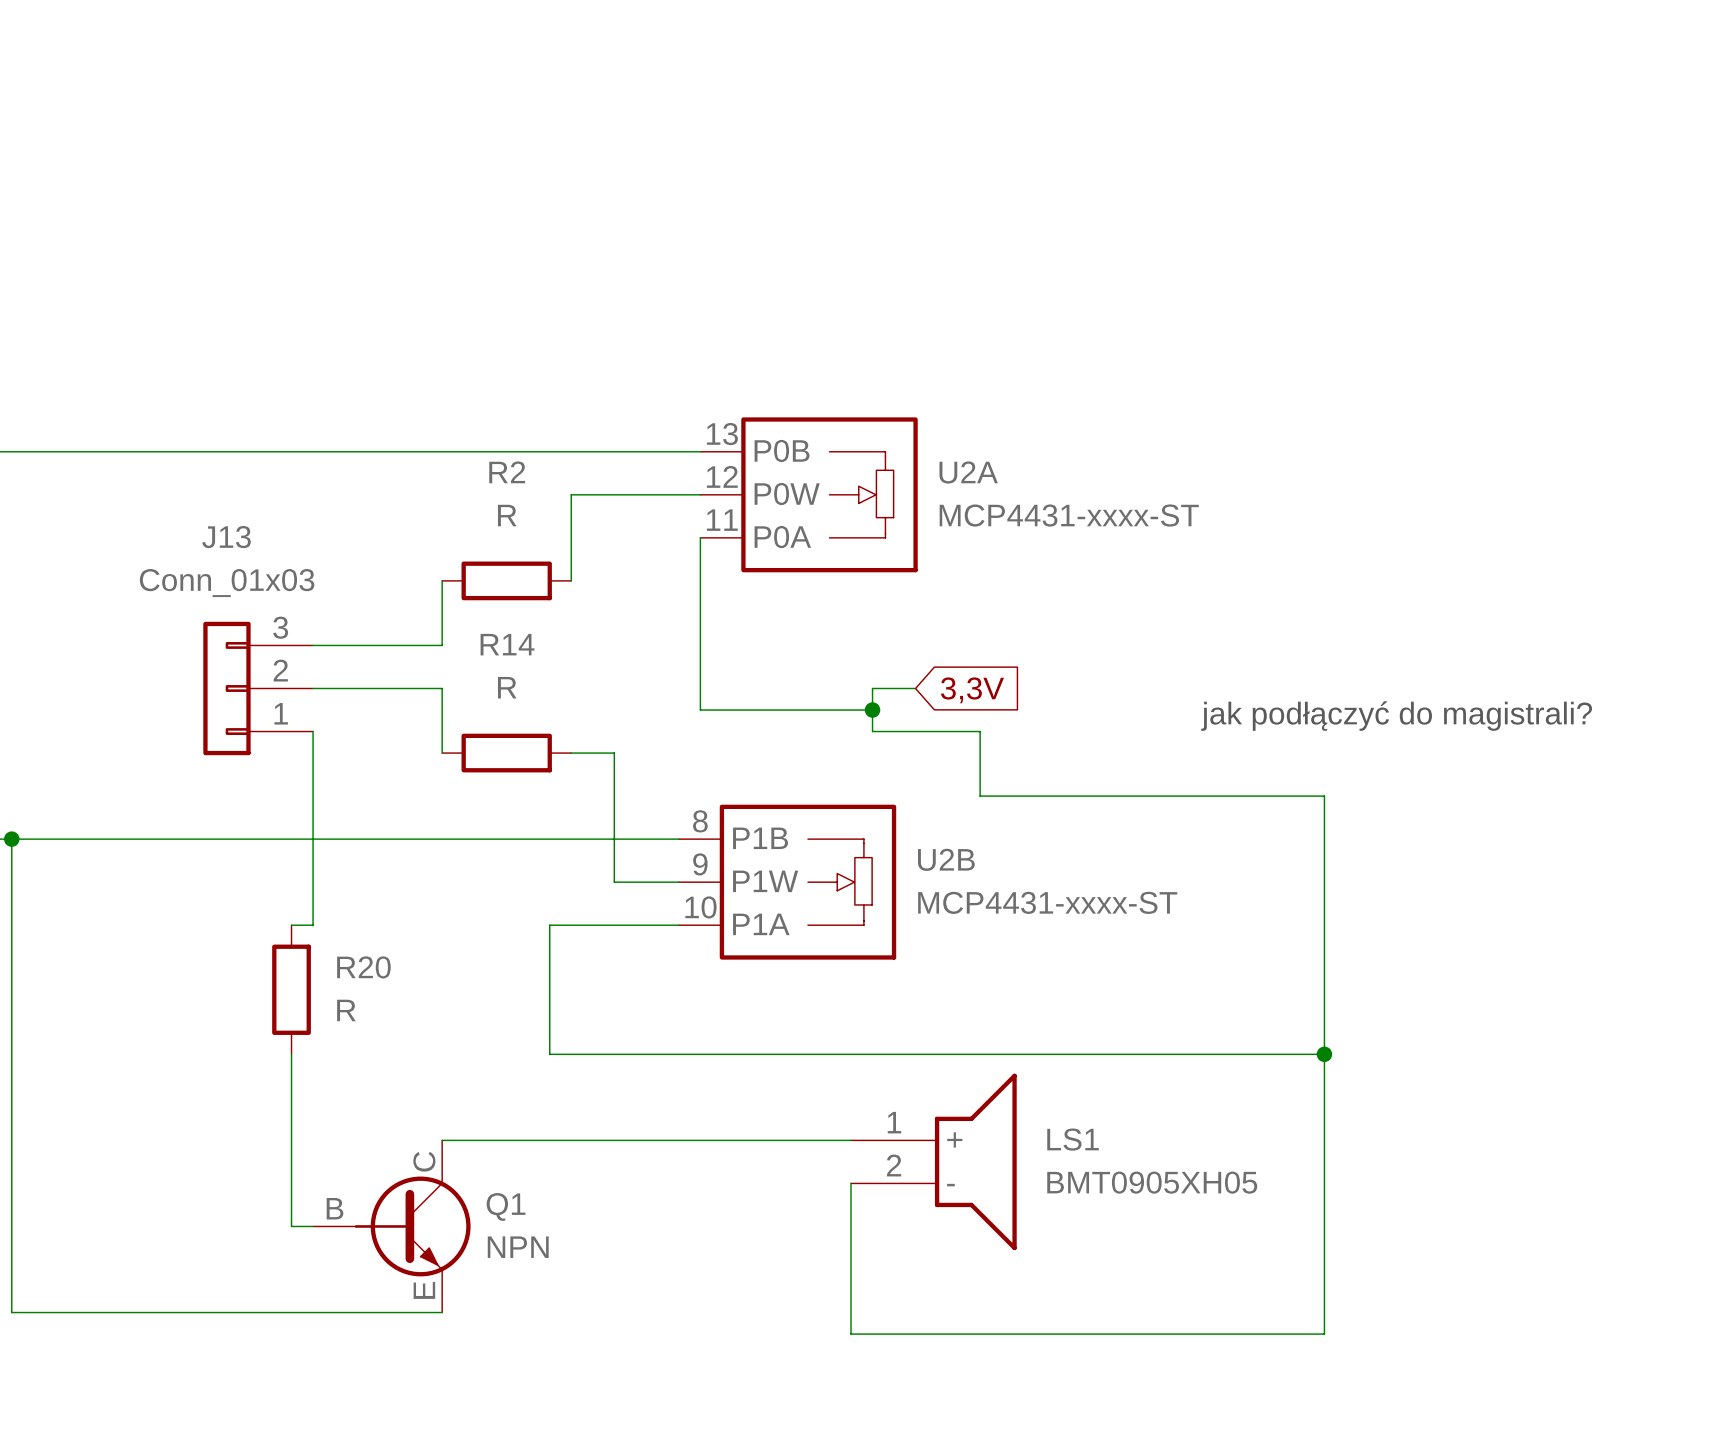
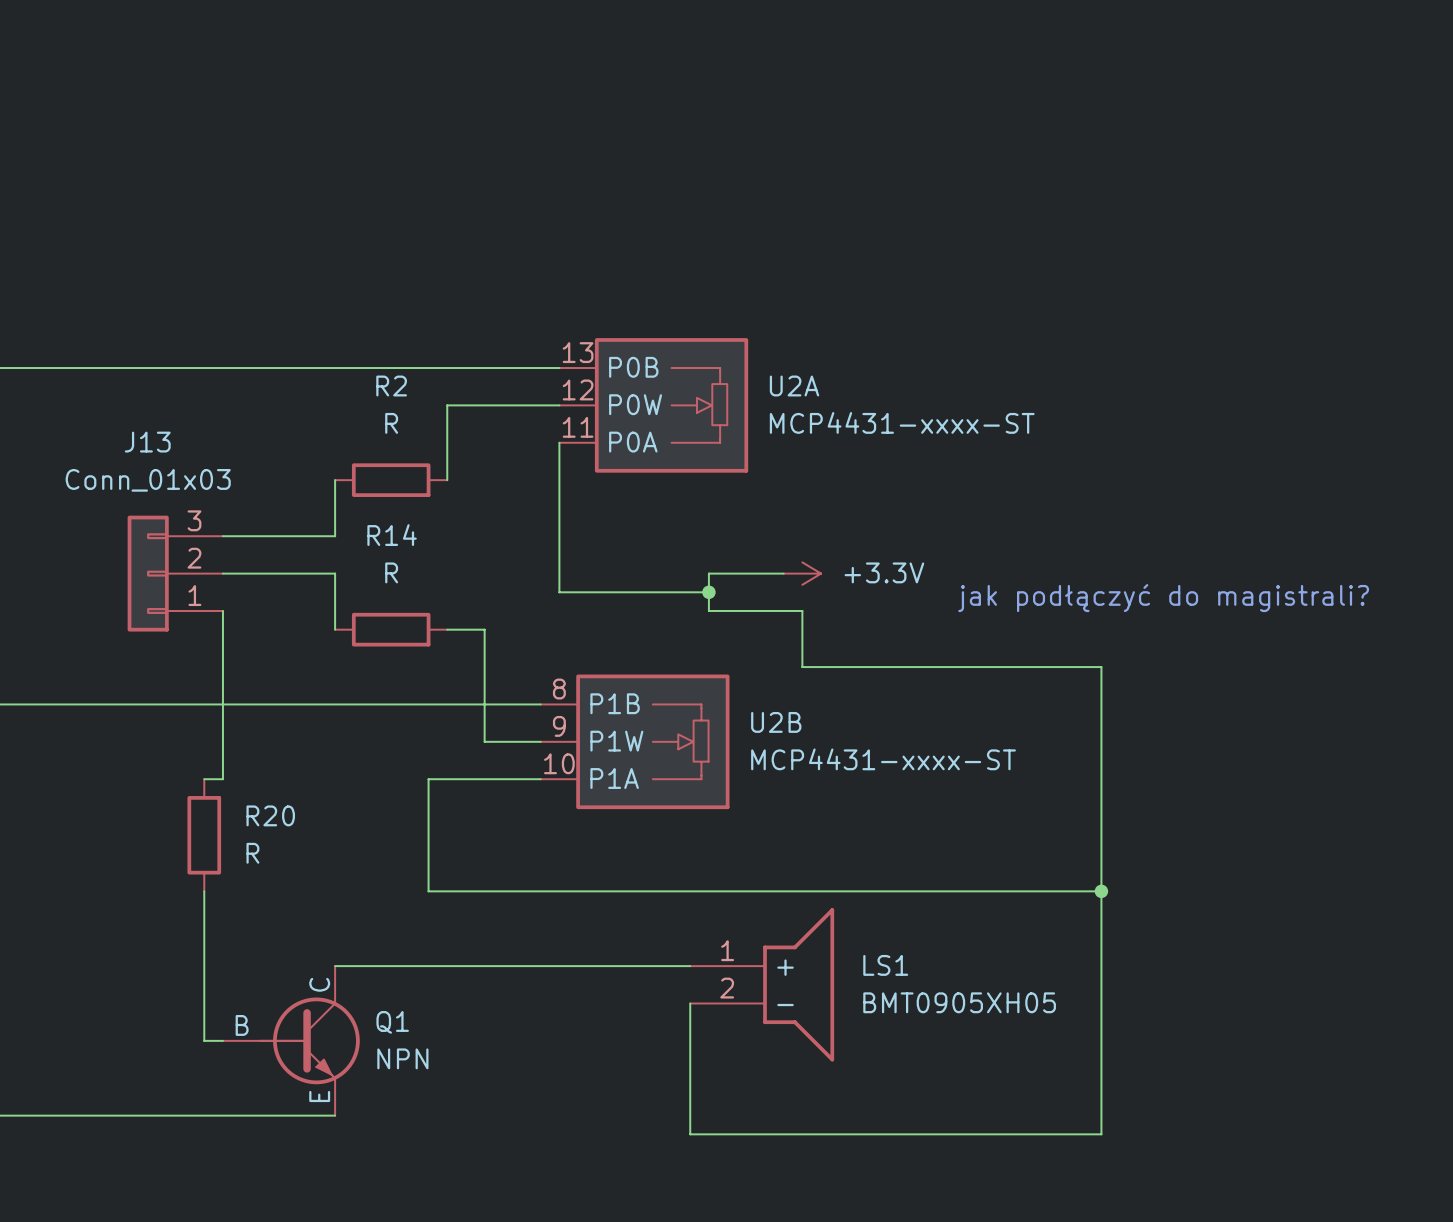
wire: none -> (746, 573) (783, 573)
power symbol: none -> +3.3V (802, 573)
global label: 3,3V (972, 690) -> none

